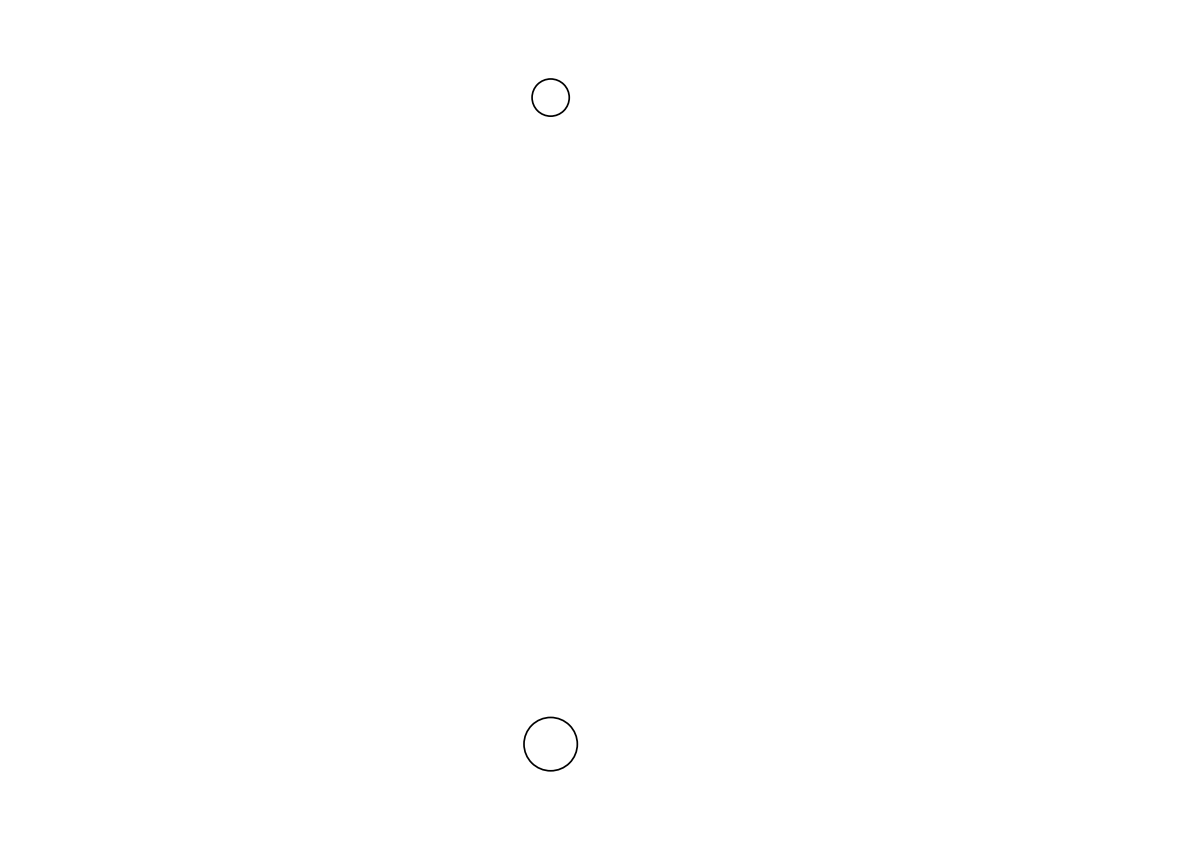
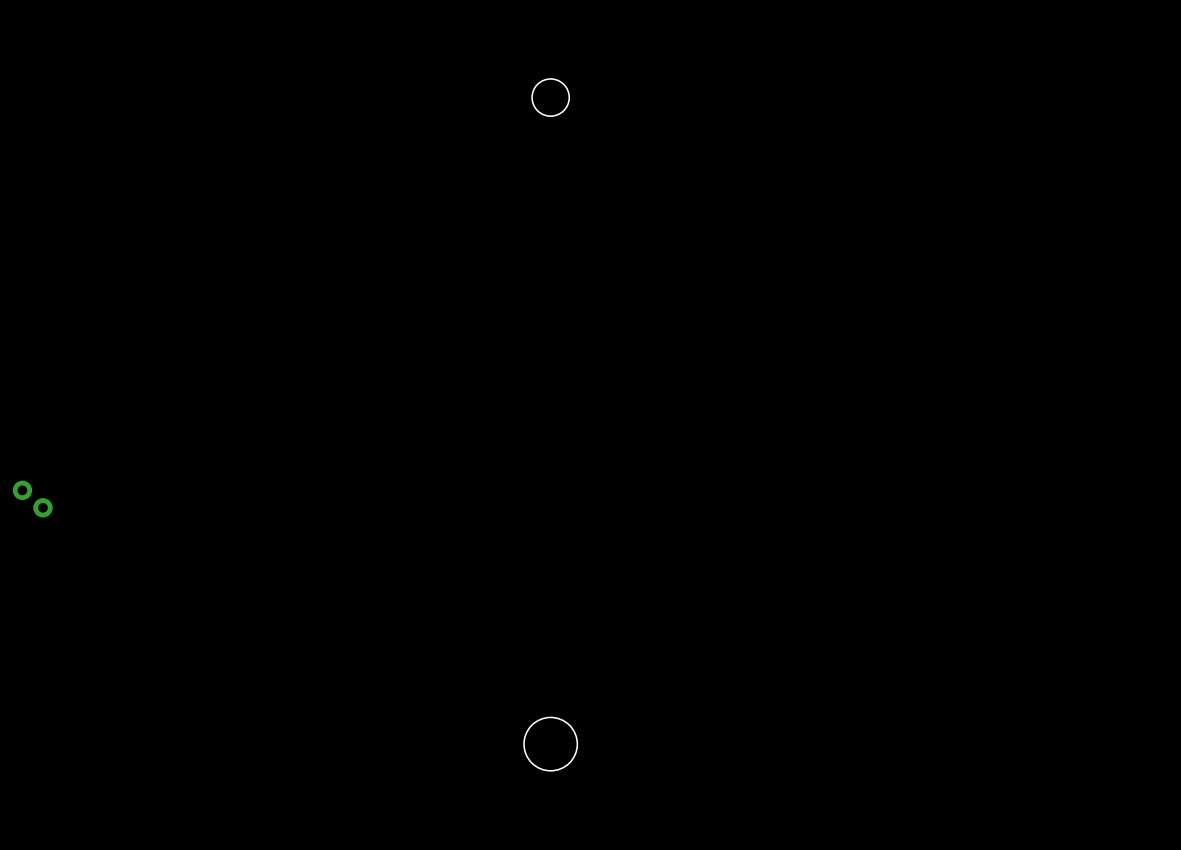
via: none -> (22, 490)
via: none -> (42, 507)

